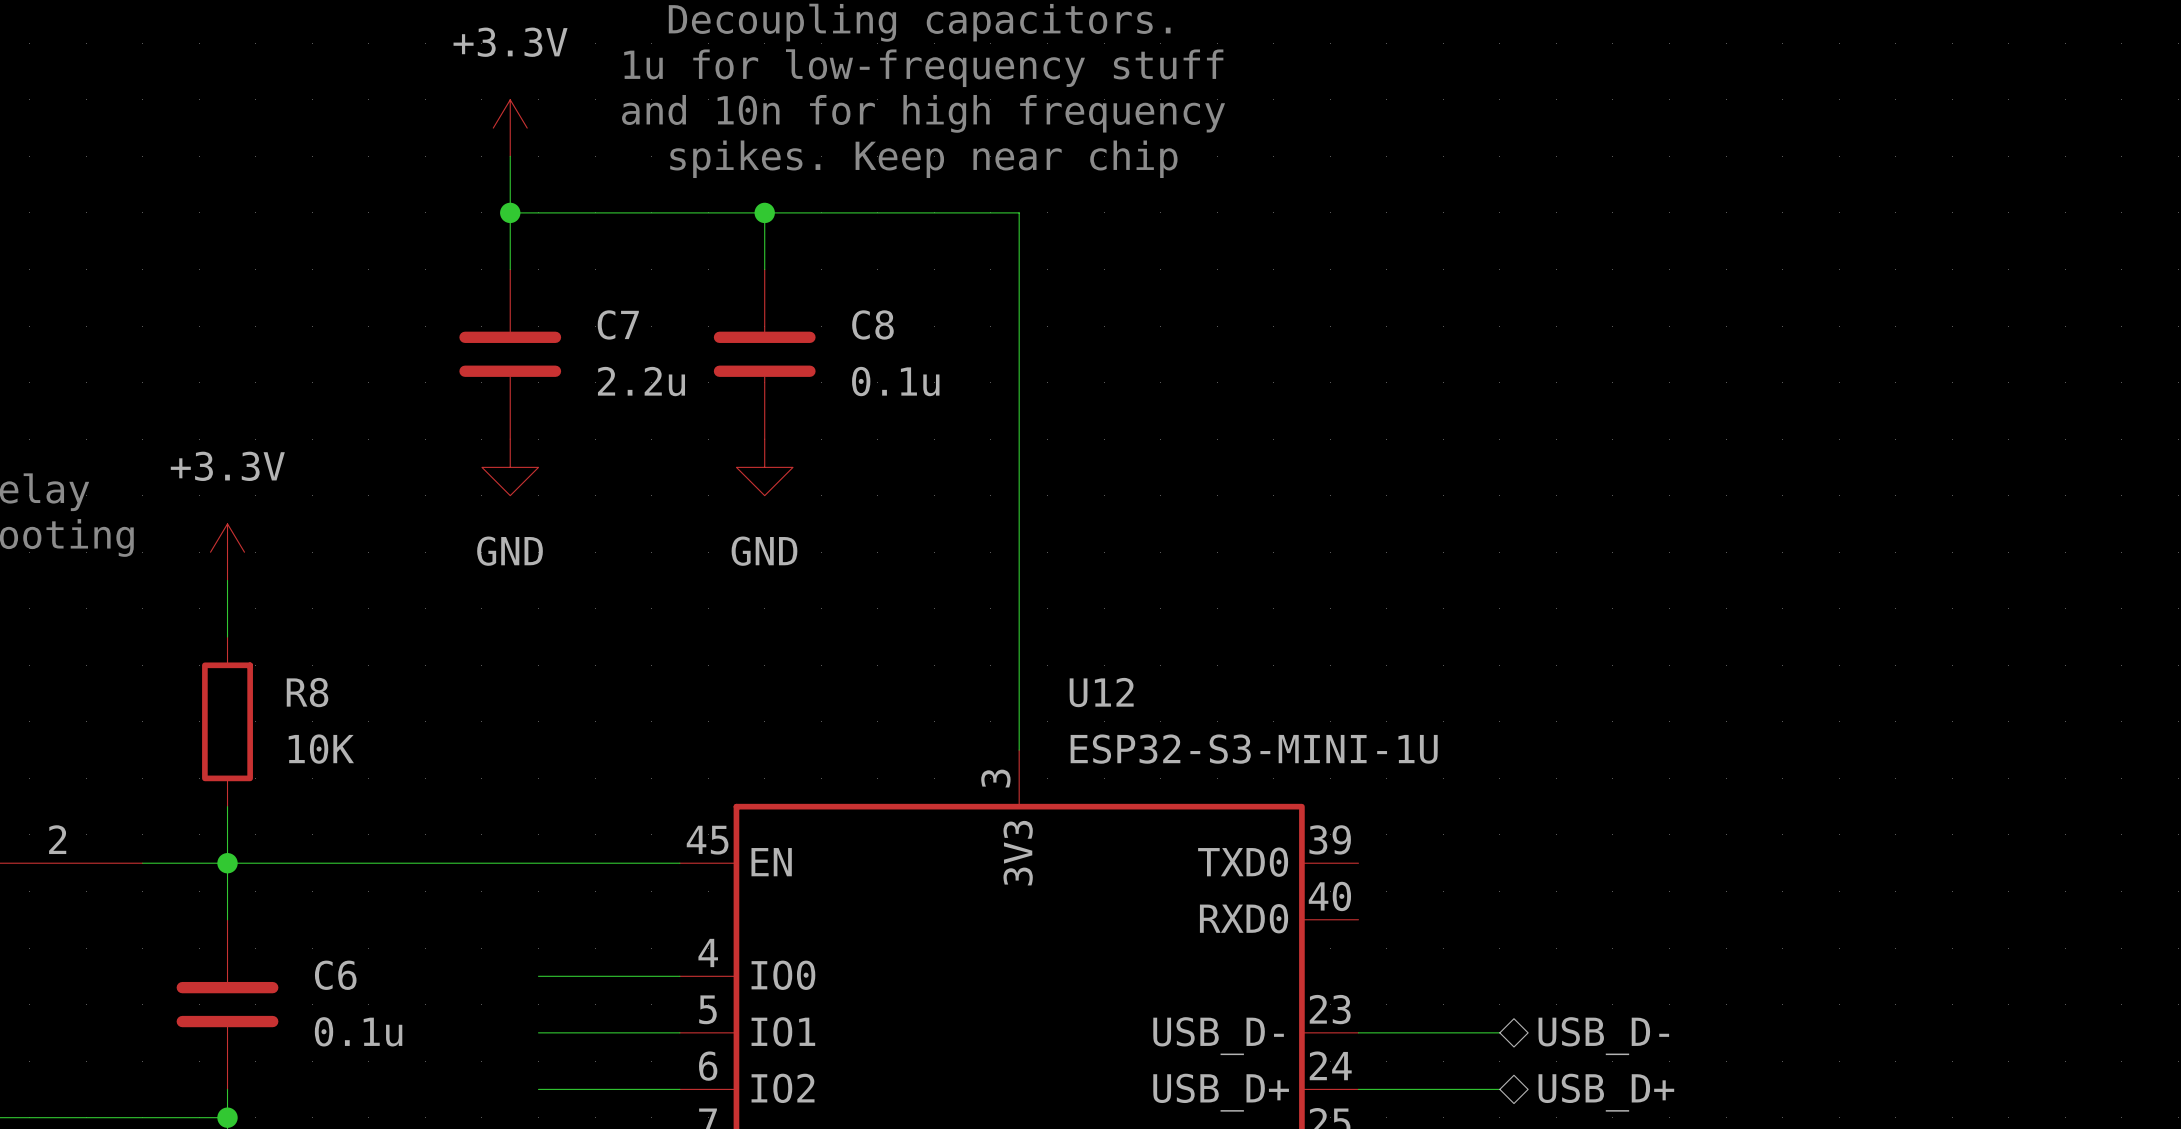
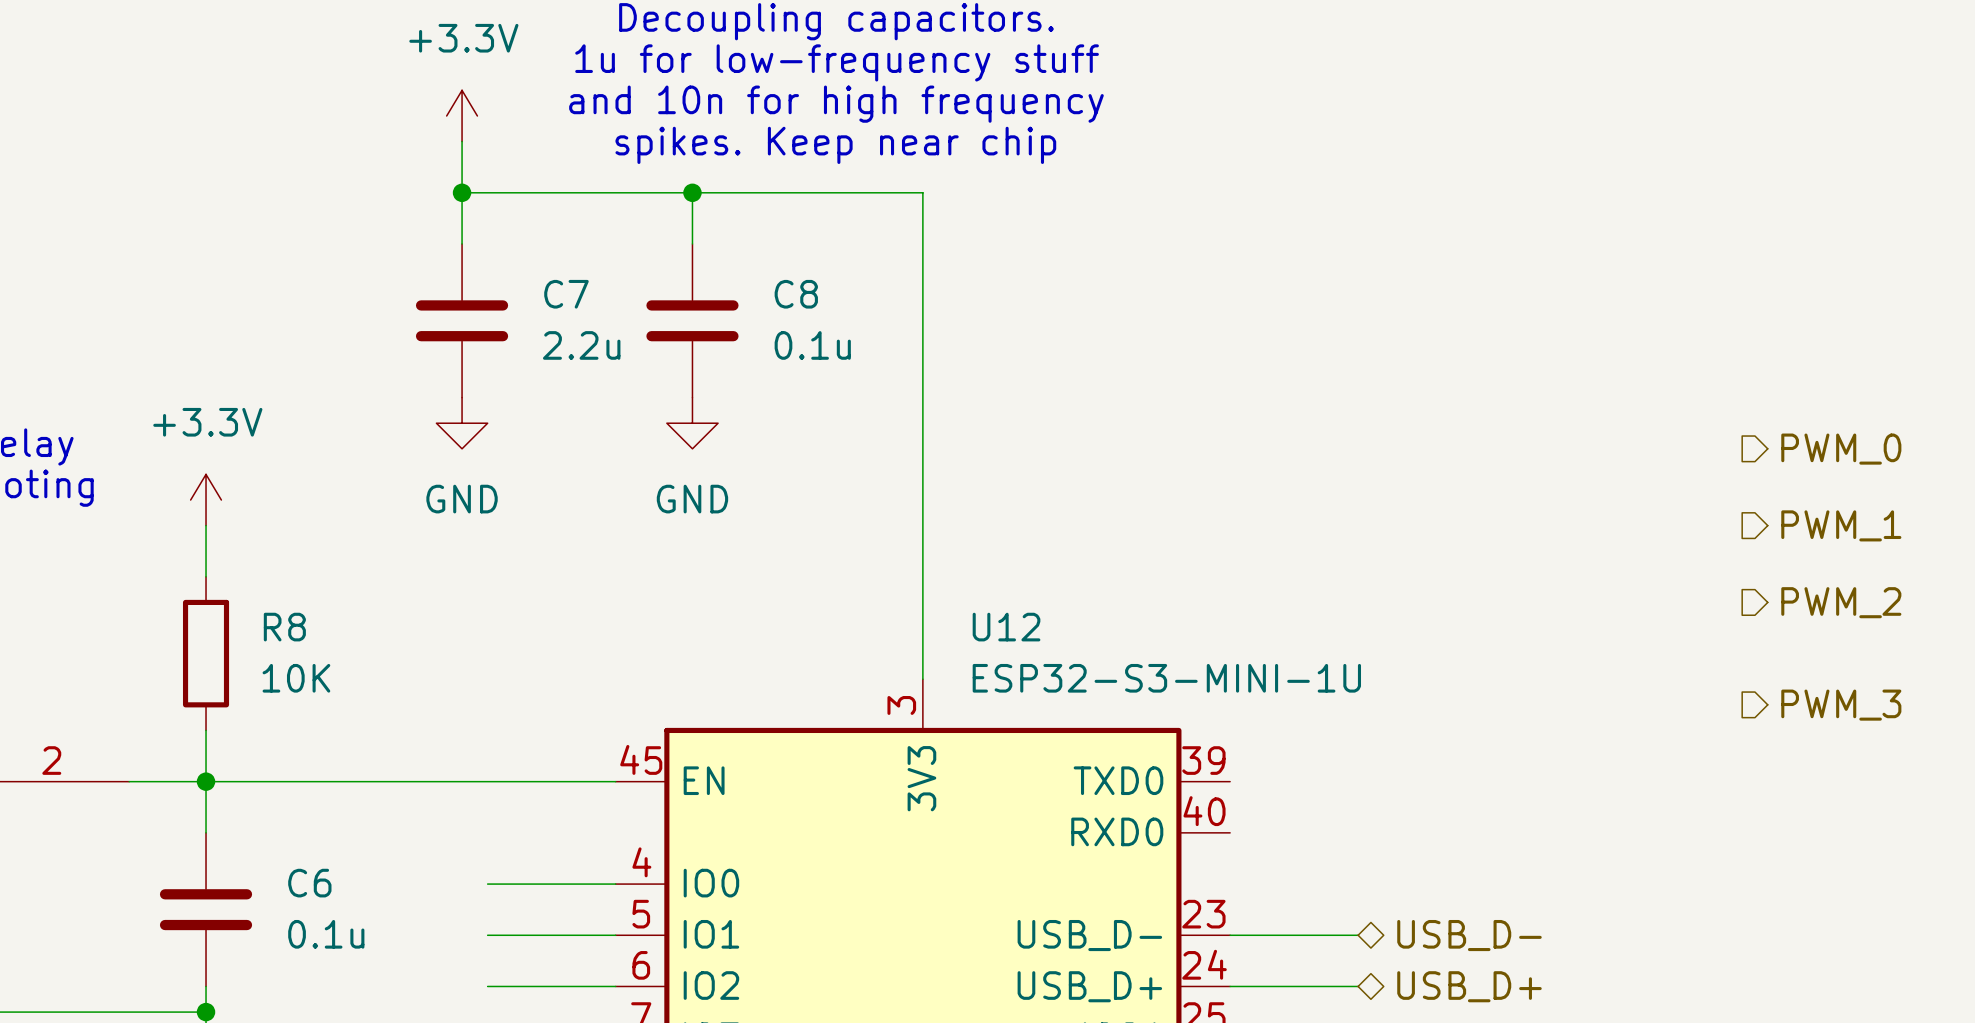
hierarchical label: none -> PWM_0 (1841, 449)
hierarchical label: none -> PWM_1 (1841, 525)
hierarchical label: none -> PWM_2 (1841, 602)
hierarchical label: none -> PWM_3 (1841, 705)

